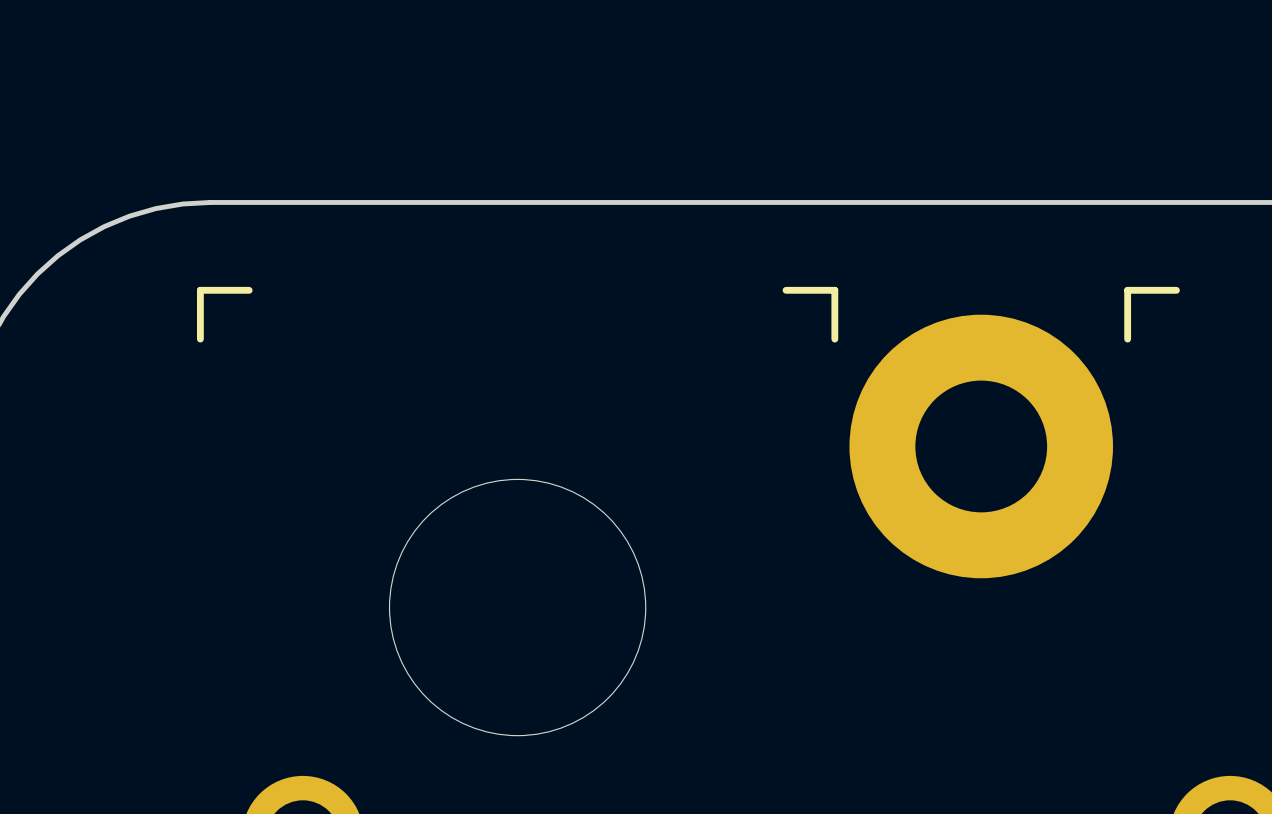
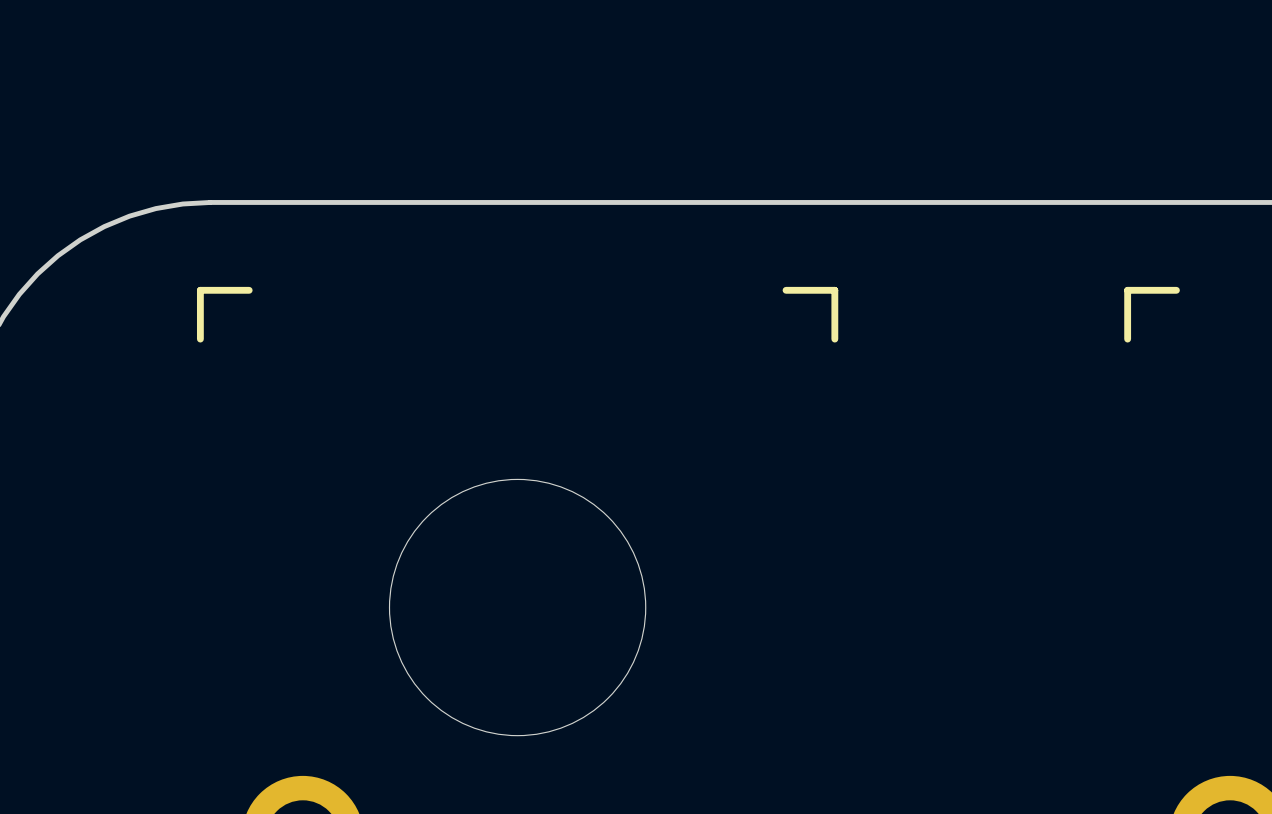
part: (981, 446) -> none

